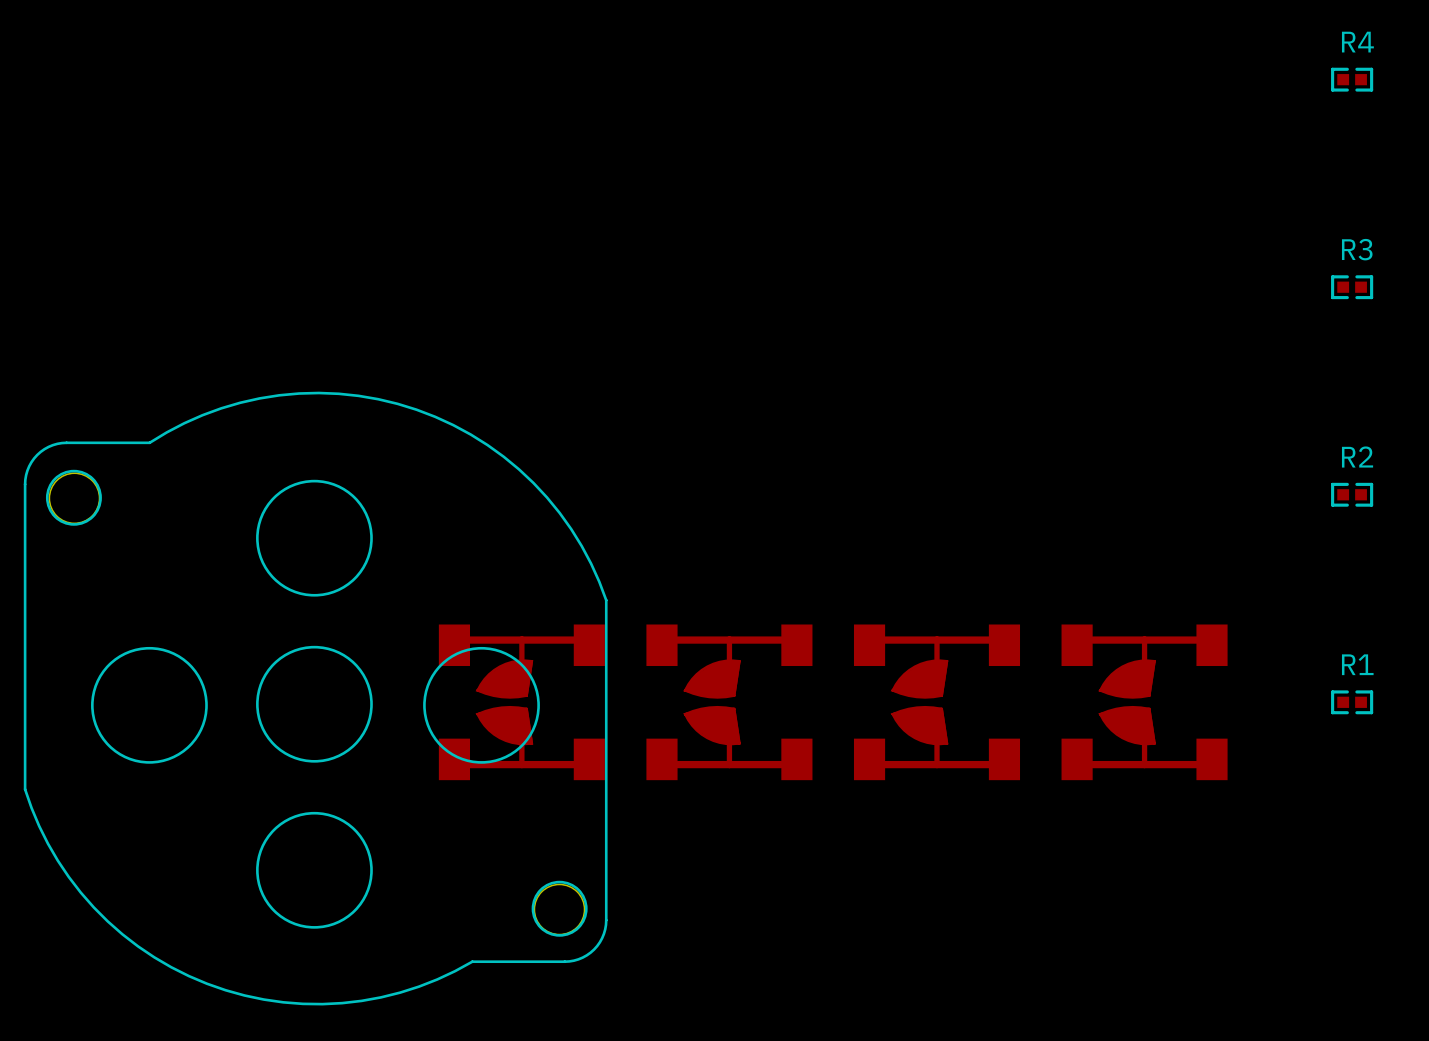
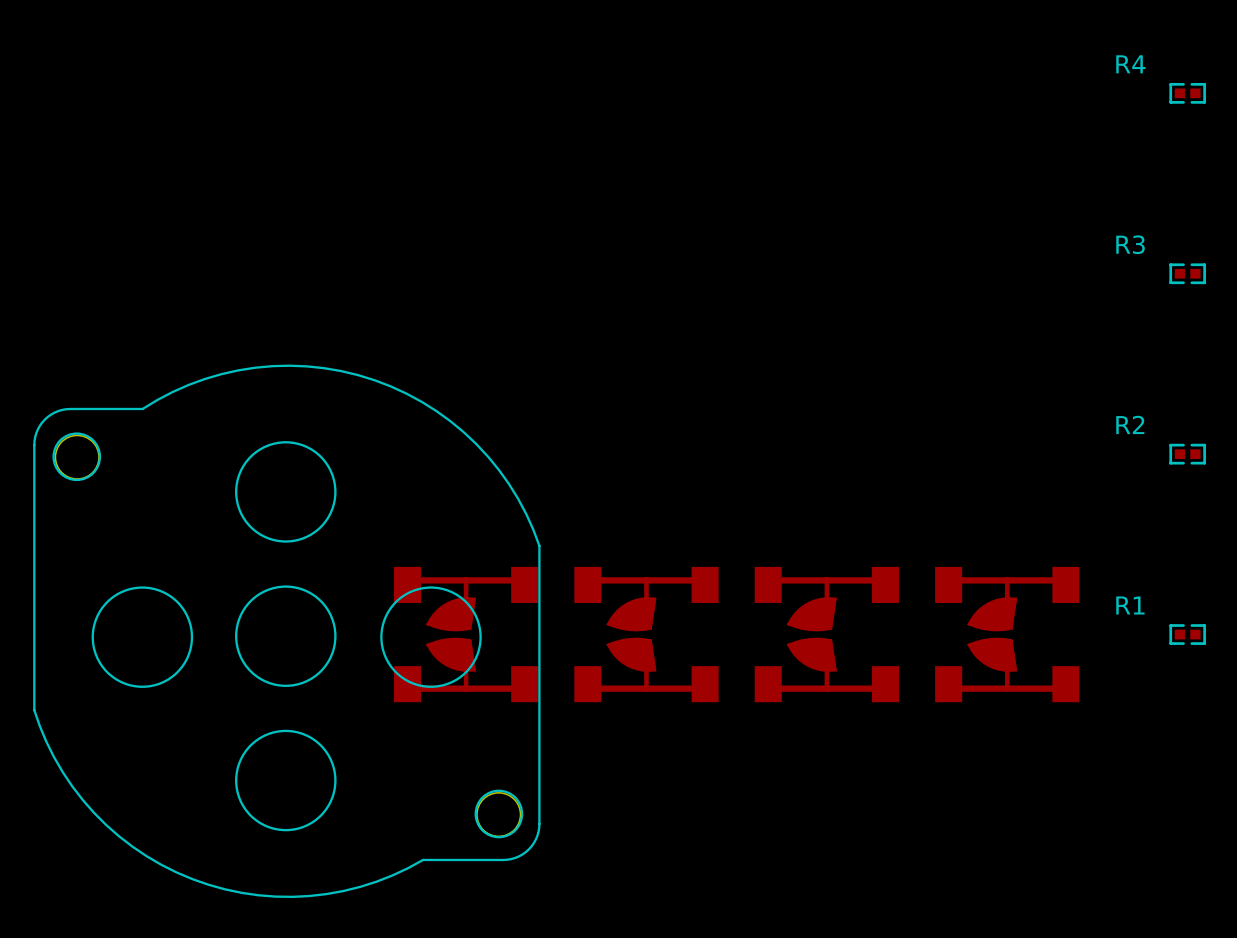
R4 name position: R4 (1357, 42) -> R4 (1130, 64)
R3 name position: R3 (1357, 249) -> R3 (1130, 244)
R2 name position: R2 (1357, 457) -> R2 (1130, 424)
R1 name position: R1 (1357, 664) -> R1 (1130, 605)

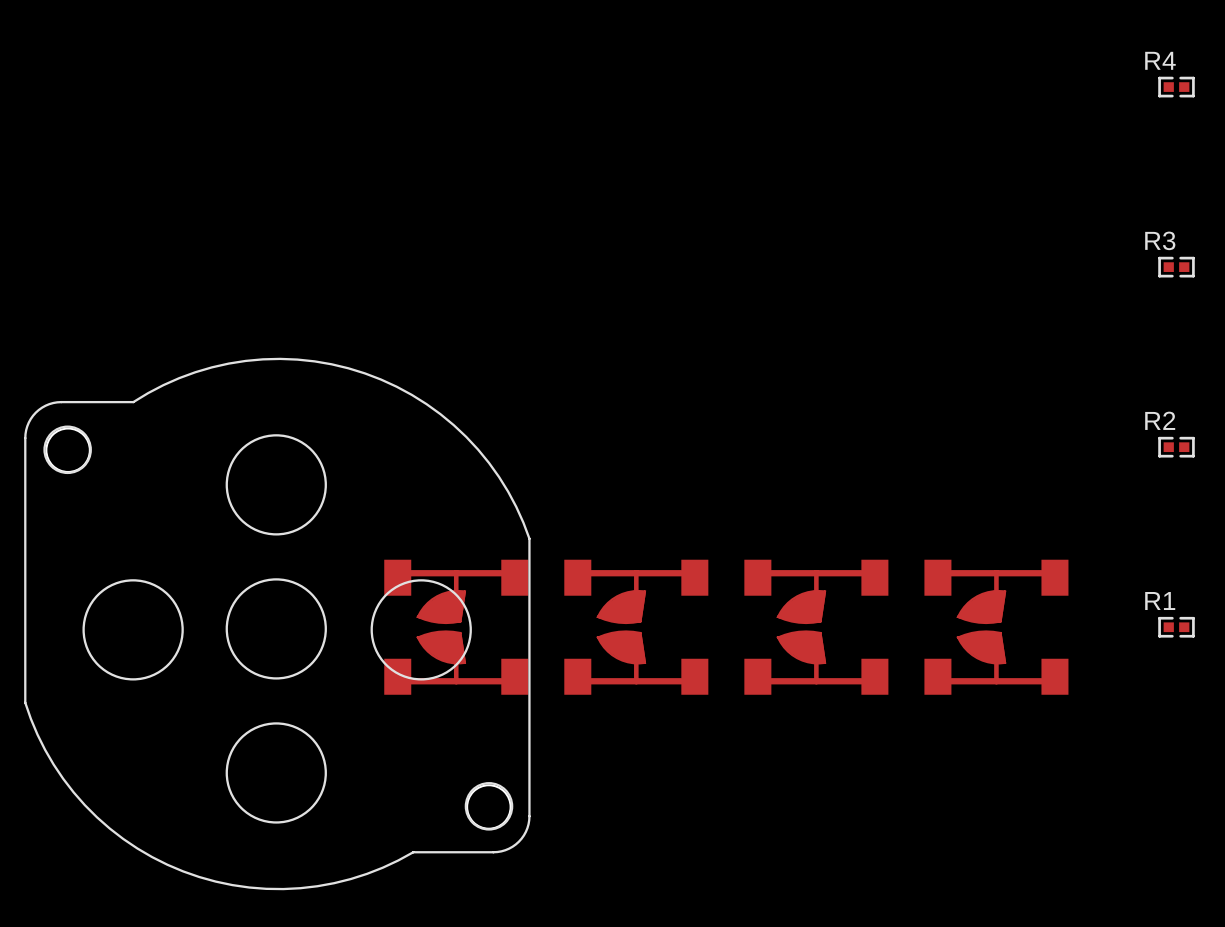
R4 name position: R4 (1130, 64) -> R4 (1160, 60)
R3 name position: R3 (1130, 244) -> R3 (1160, 240)
R2 name position: R2 (1130, 424) -> R2 (1160, 420)
R1 name position: R1 (1130, 605) -> R1 (1160, 601)

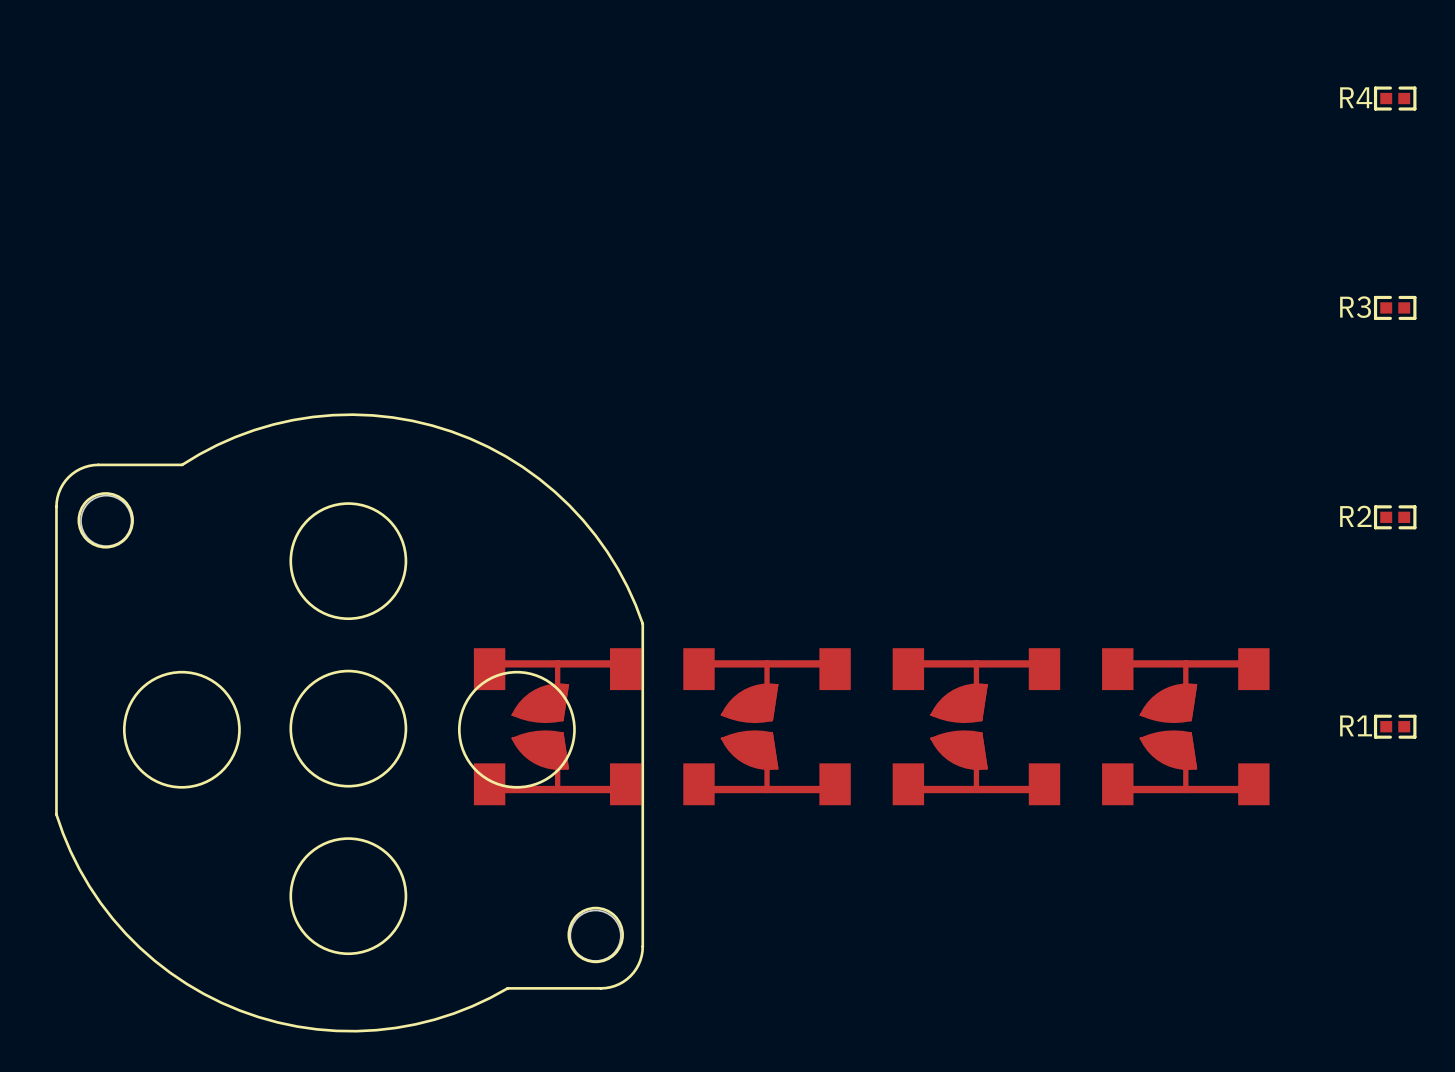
R4 name position: R4 (1160, 60) -> R4 (1356, 97)
R3 name position: R3 (1160, 240) -> R3 (1355, 307)
R2 name position: R2 (1160, 420) -> R2 (1355, 516)
R1 name position: R1 (1160, 601) -> R1 (1356, 725)

